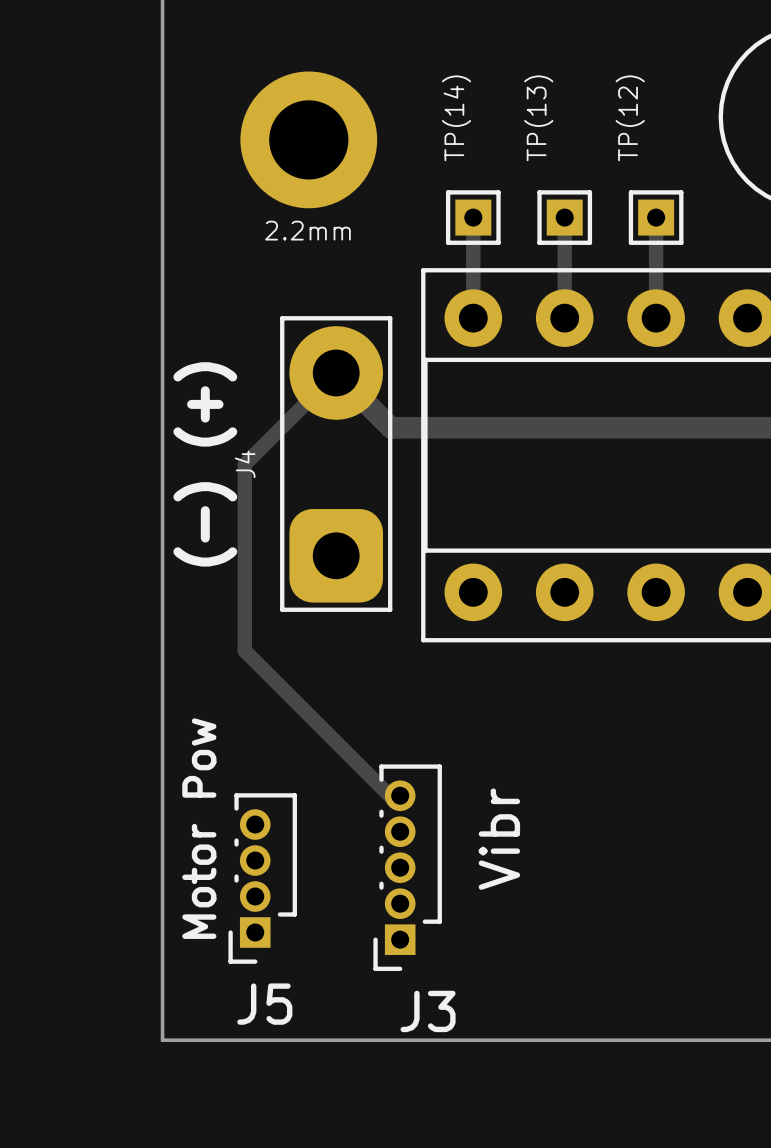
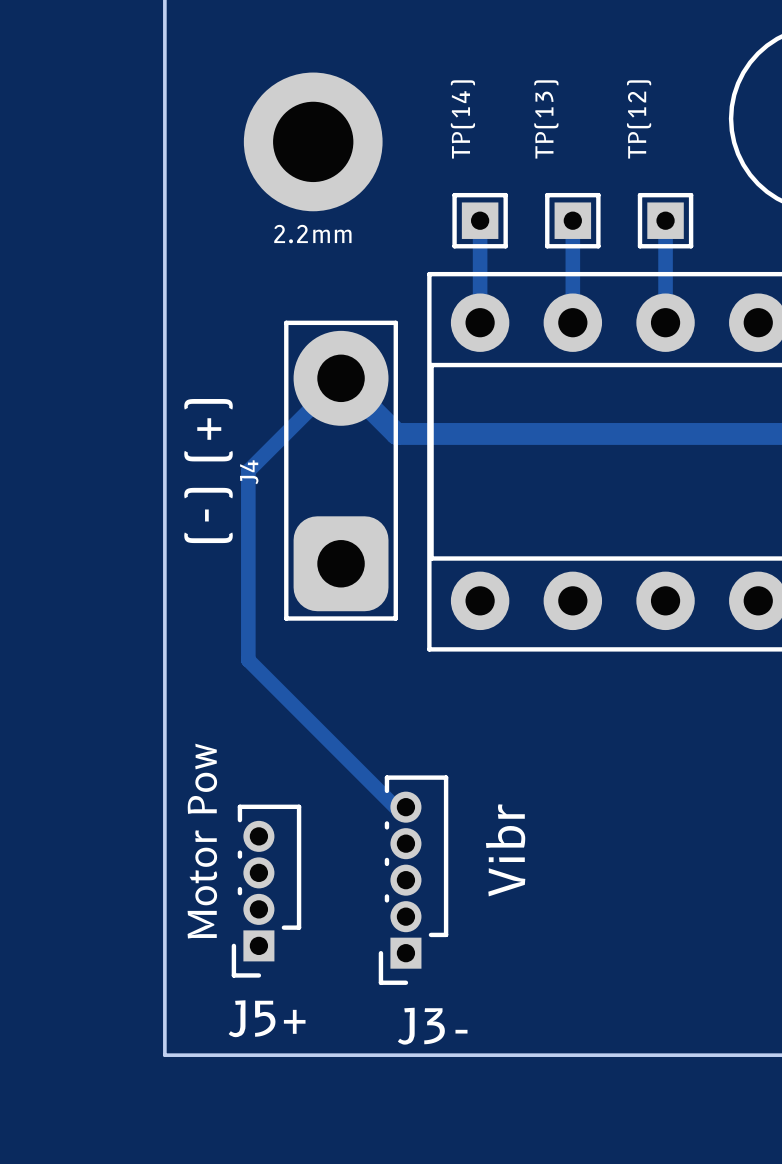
J5 name: J5 (264, 1004) -> J5+ (267, 1018)
J3 name: J3 (428, 1011) -> J3- (432, 1026)

